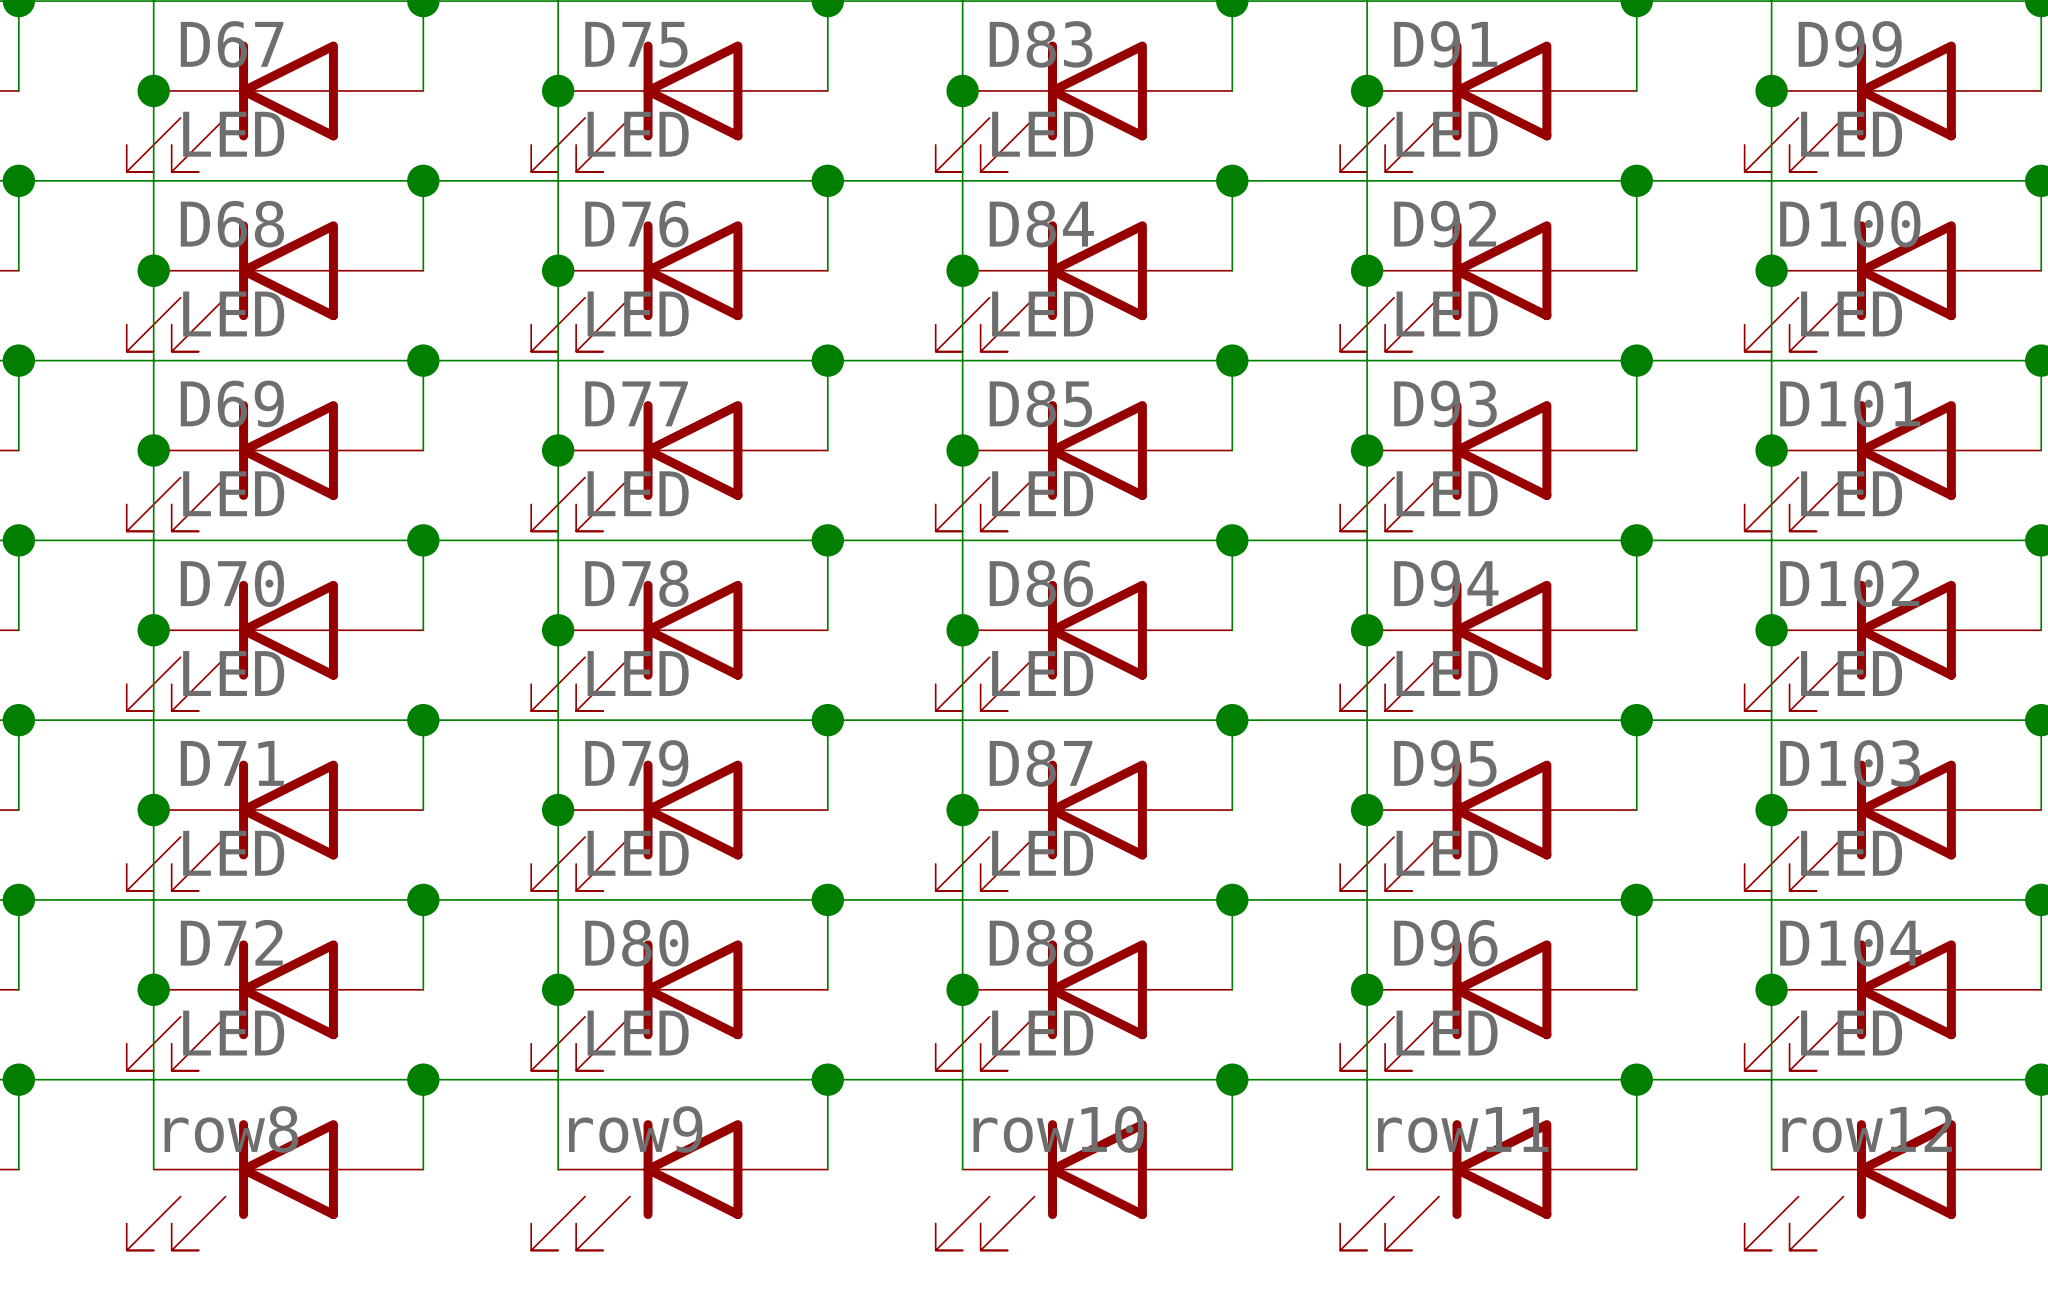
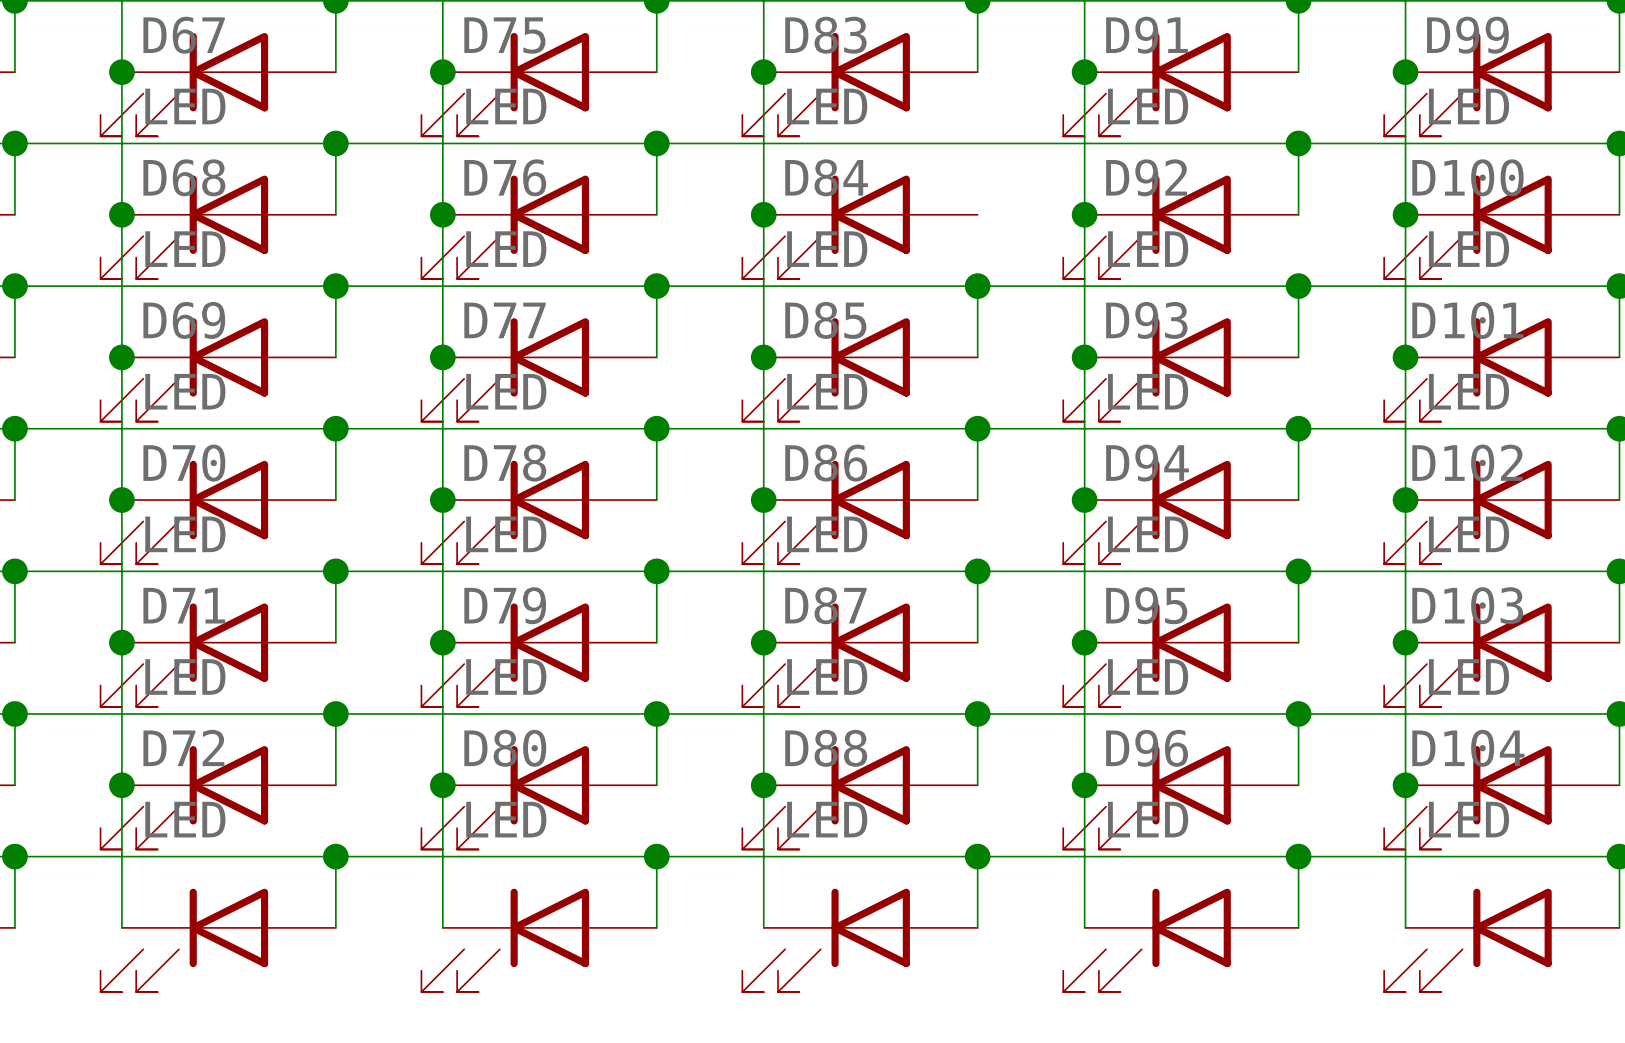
wire: (1232, 180) (1232, 270) -> none
junction: (1232, 180) -> none
label: row8 (231, 1129) -> none
label: row9 (635, 1129) -> none
label: row10 (1058, 1129) -> none
label: row11 (1463, 1129) -> none
label: row12 (1867, 1129) -> none

